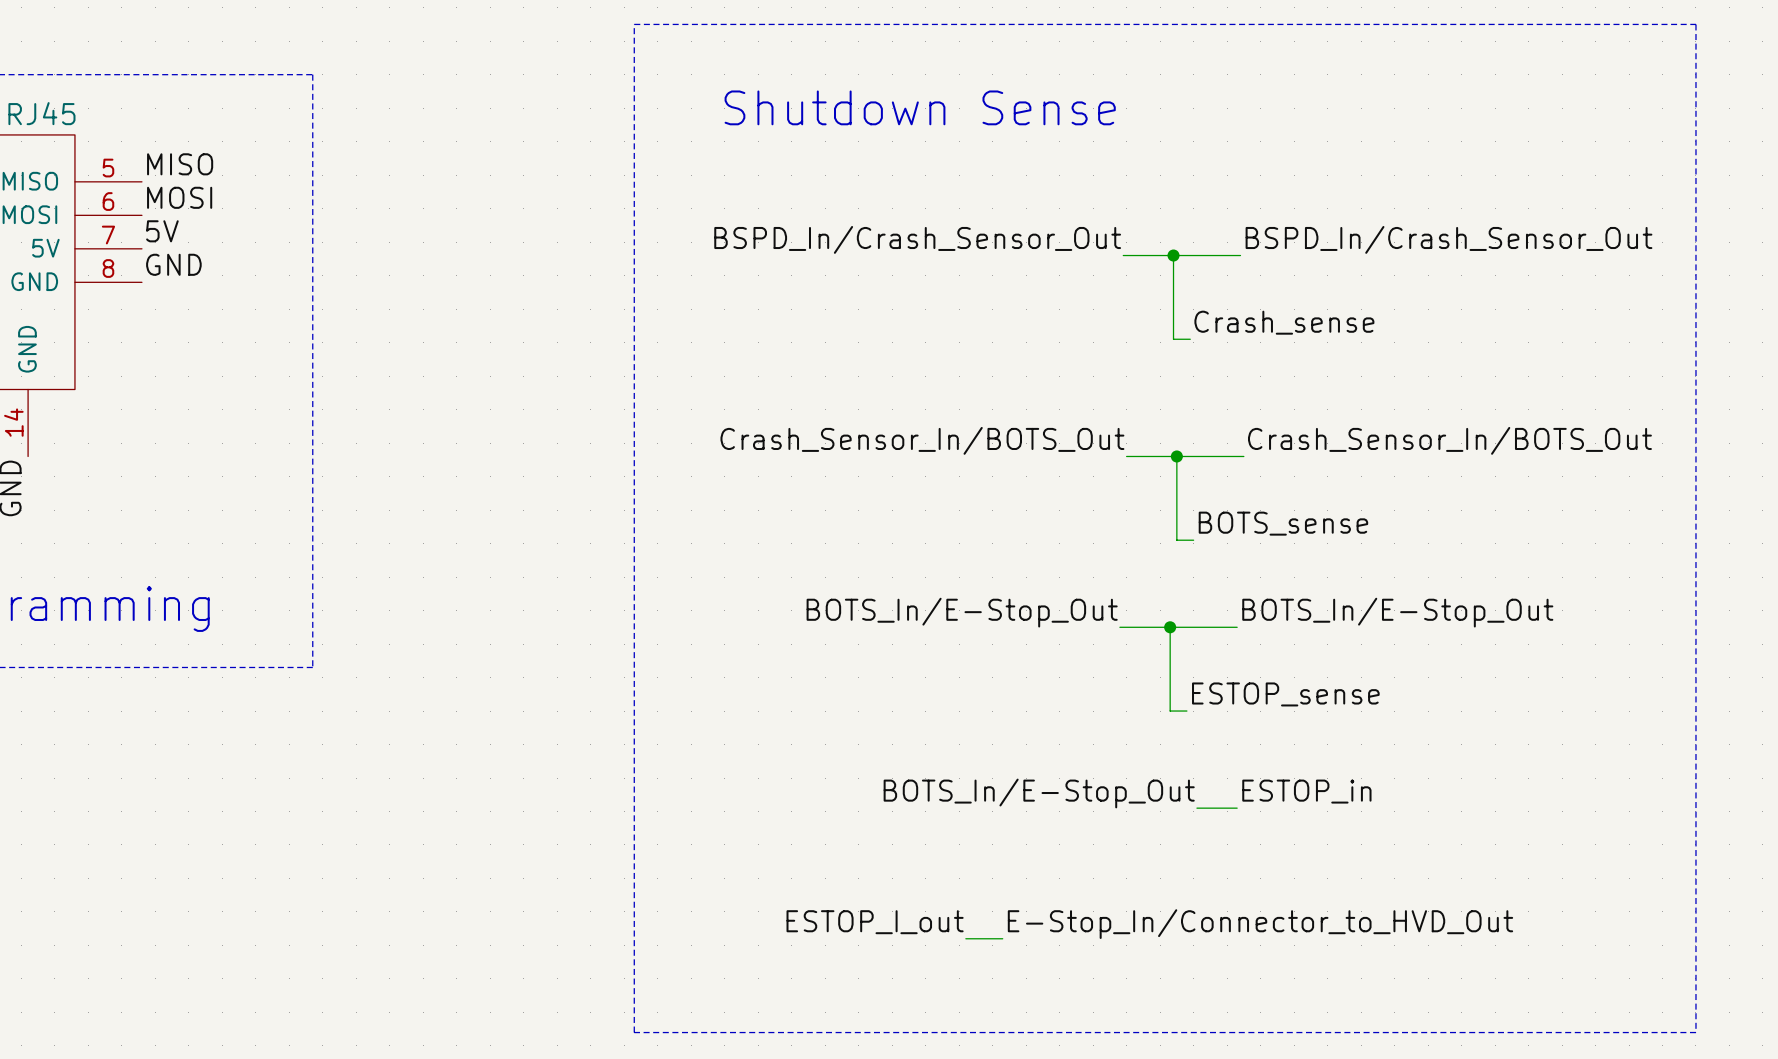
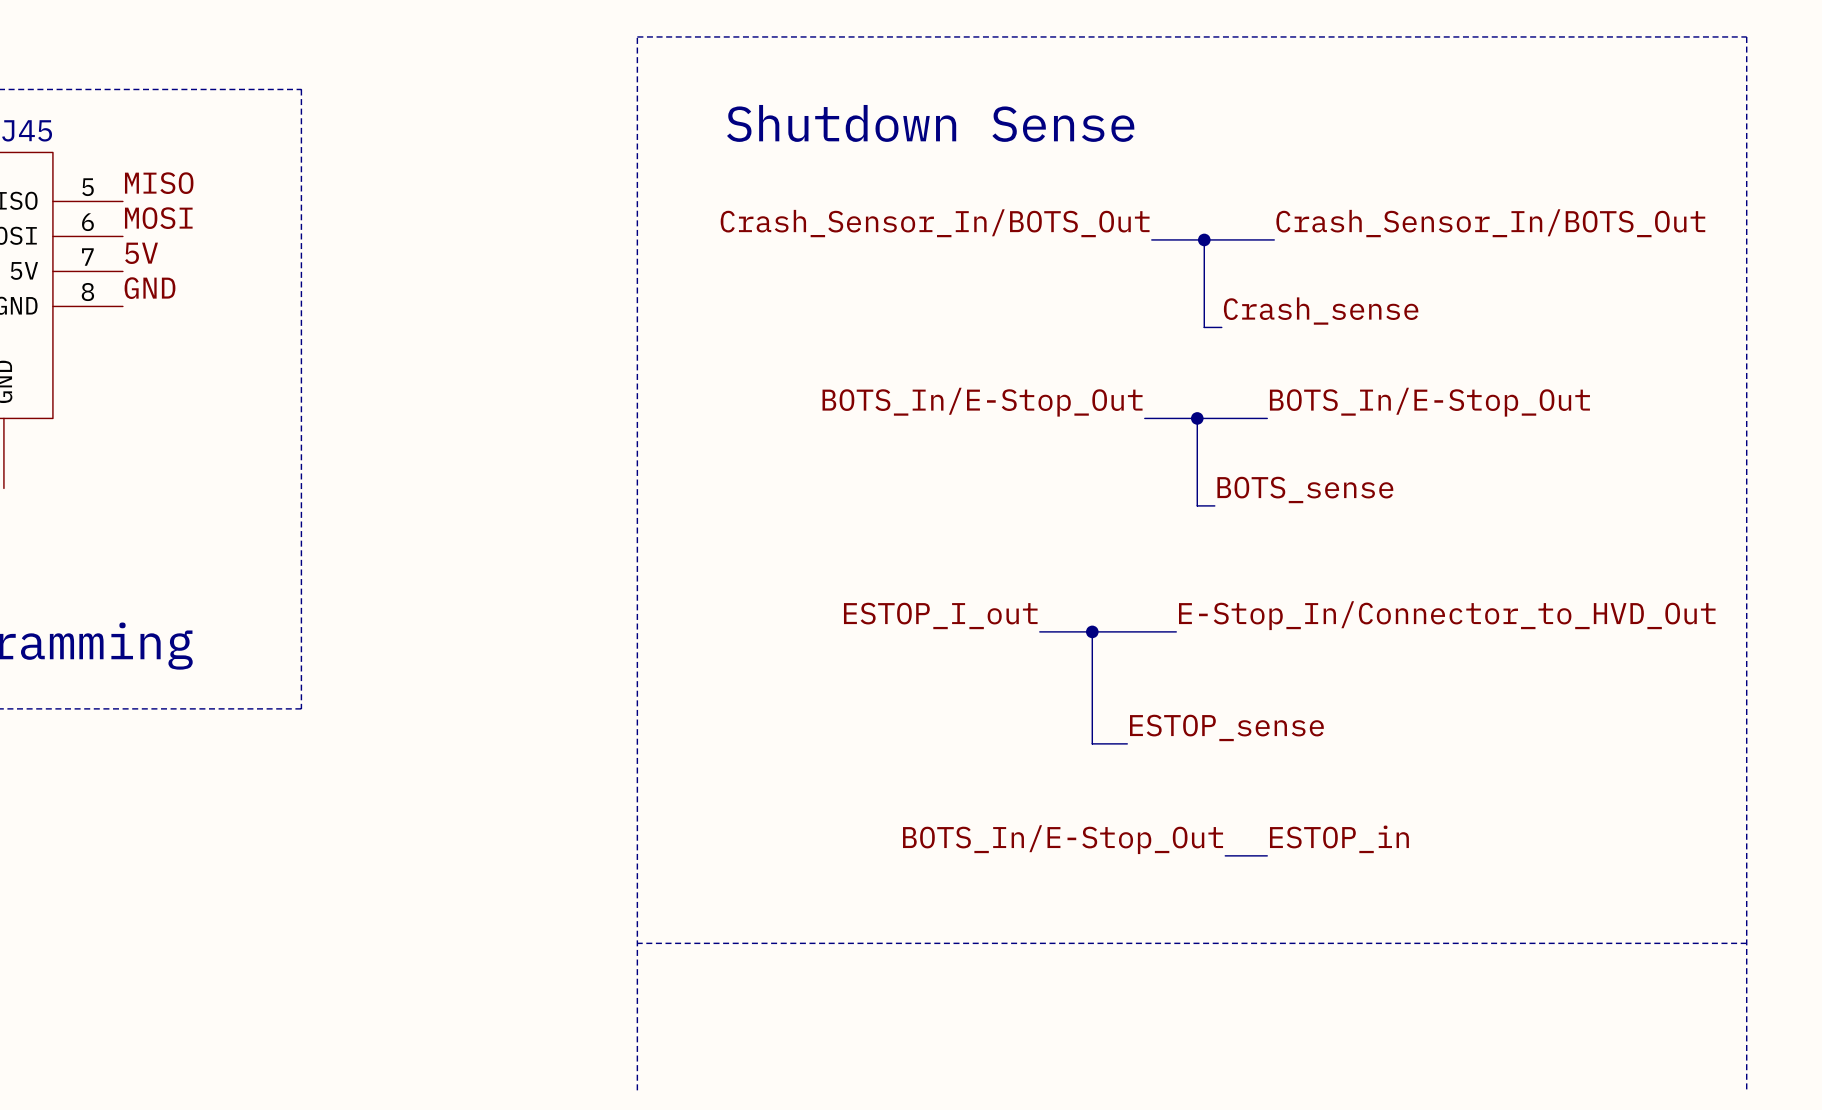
label: BSPD_In/Crash_Sensor_Out (917, 239) -> Crash_Sensor_In/BOTS_Out (935, 223)
label: BSPD_In/Crash_Sensor_Out (1448, 239) -> Crash_Sensor_In/BOTS_Out (1490, 223)
wire: (1123, 255) (1240, 255) -> none
wire: (1173, 255) (1173, 339) (1190, 339) -> none
junction position: (1173, 255) -> (1204, 239)
label position: Crash_sense (1284, 322) -> Crash_sense (1321, 311)
label: none -> BOTS_In/E-Stop_Out (982, 402)
label: none -> BOTS_In/E-Stop_Out (1429, 402)
junction: none -> (1197, 418)
label: Crash_Sensor_In/BOTS_Out (922, 440) -> none
label: Crash_Sensor_In/BOTS_Out (1449, 440) -> none
wire: (1126, 456) (1243, 456) -> (1151, 239) (1274, 239)
wire: (1176, 456) (1176, 540) (1193, 540) -> (1204, 239) (1204, 327) (1221, 327)
junction: (1176, 456) -> none
label position: BOTS_sense (1283, 523) -> BOTS_sense (1305, 489)
label: none -> ESTOP_I_out (940, 615)
label: none -> E-Stop_In/Connector_to_HVD_Out (1447, 615)
wire: none -> (1039, 631) (1176, 631)
wire: none -> (1092, 631) (1092, 743) (1127, 743)
junction: none -> (1092, 631)
label: BOTS_In/E-Stop_Out (962, 612) -> none
label: BOTS_In/E-Stop_Out (1397, 612) -> none
wire: (1119, 627) (1237, 627) -> (1144, 418) (1267, 418)
wire: (1170, 627) (1170, 711) (1186, 711) -> (1197, 418) (1197, 505) (1214, 505)
junction: (1170, 627) -> none
label position: ESTOP_sense (1285, 694) -> ESTOP_sense (1226, 727)
label: ESTOP_I_out (875, 922) -> none
label: E-Stop_In/Connector_to_HVD_Out (1260, 924) -> none
wire: (965, 938) (1002, 938) -> none
line: (634, 1032) (1695, 1032) -> (637, 943) (1746, 943)

